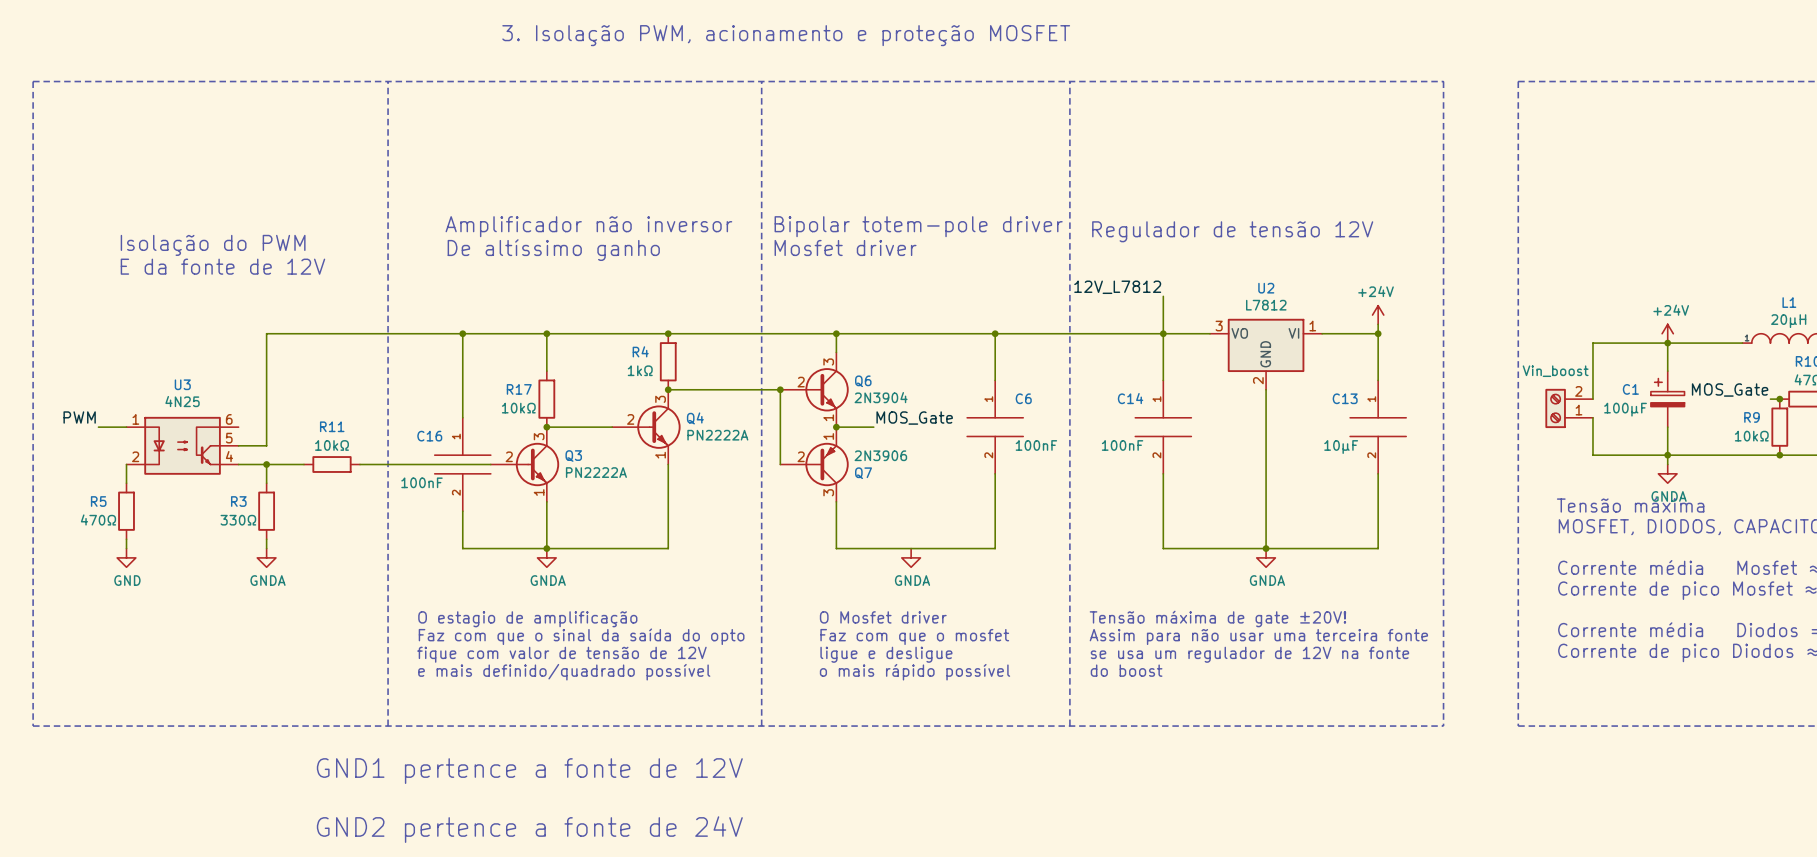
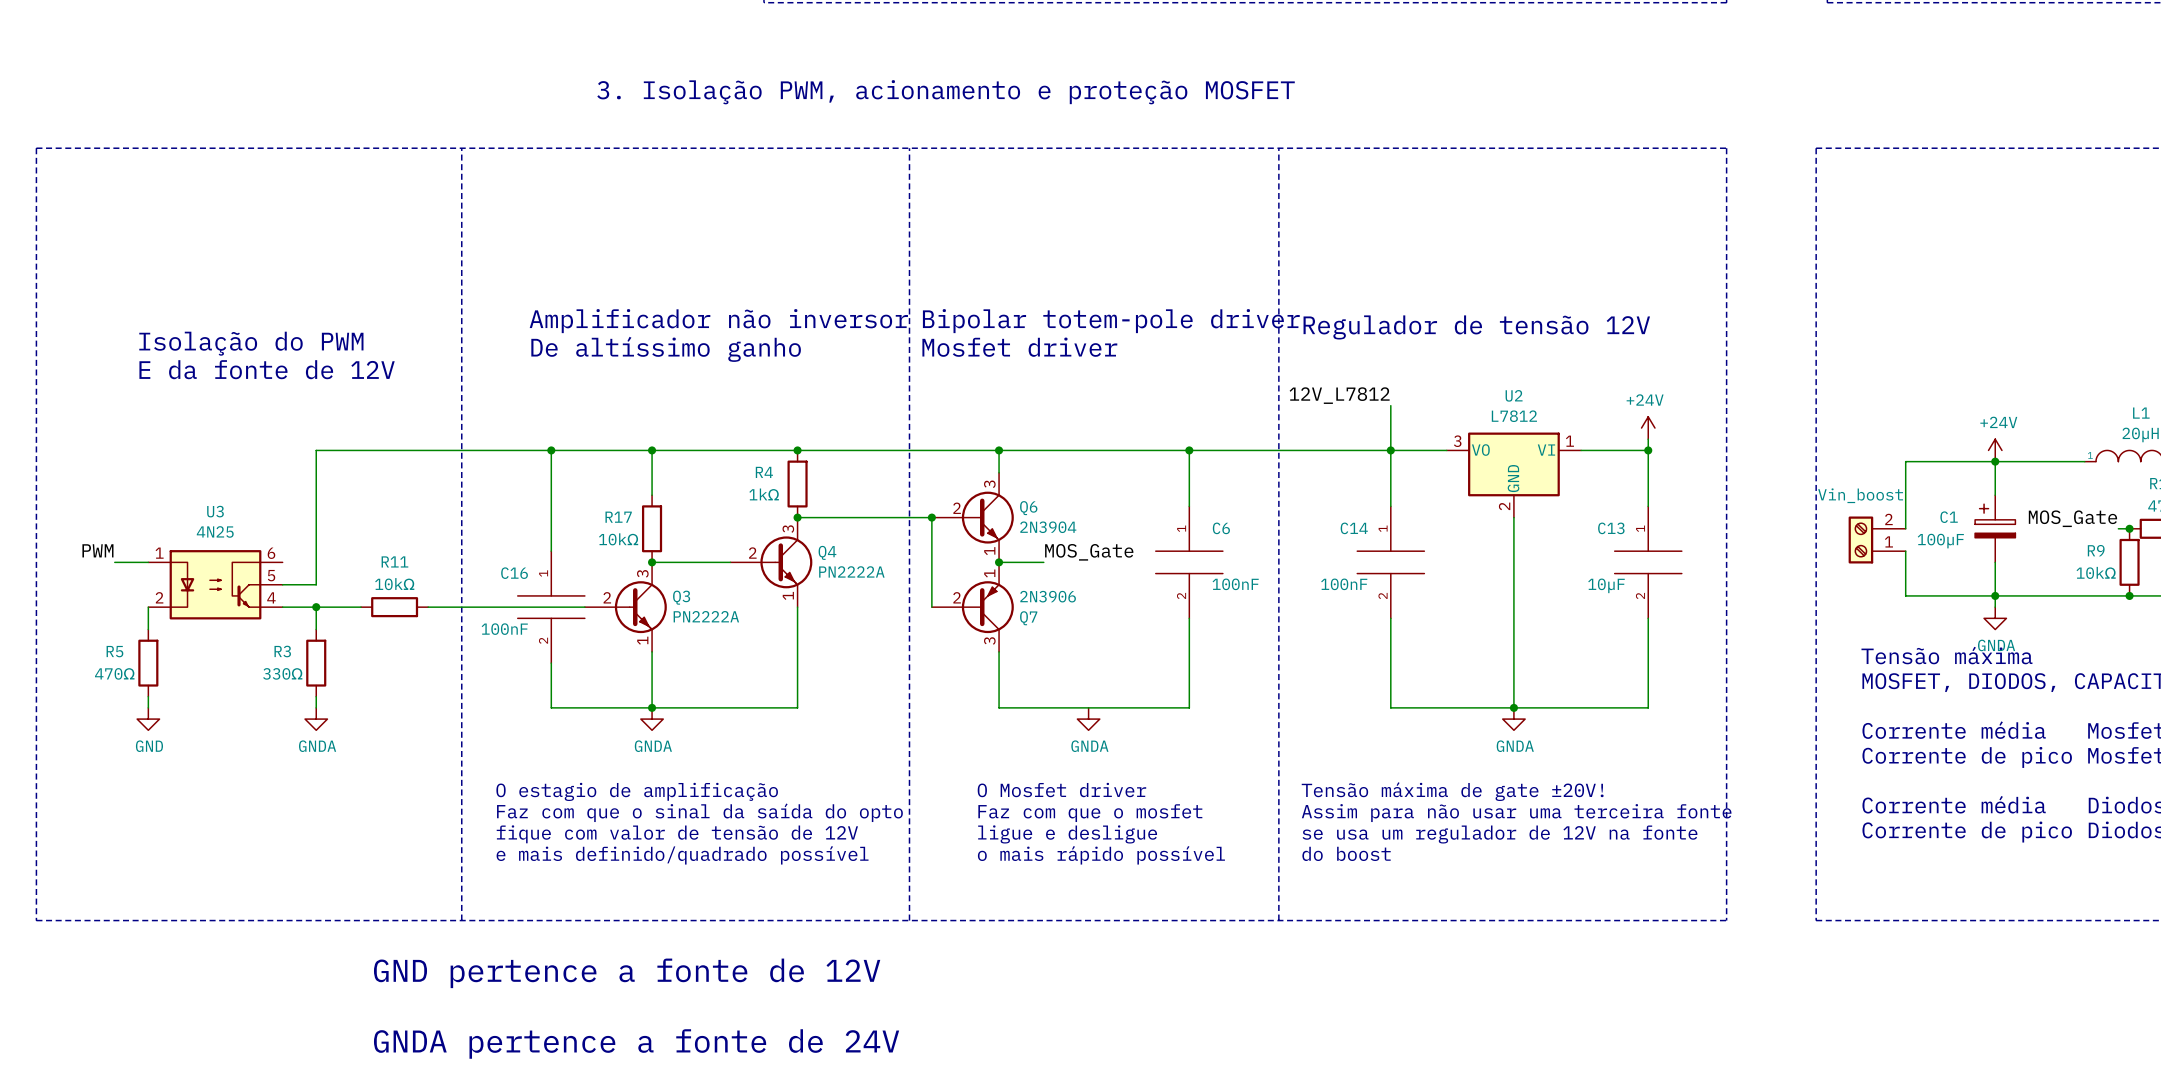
text: GND1 pertence a fonte de 12V (529, 771) -> GND pertence a fonte de 12V (627, 973)
text: GND2 pertence a fonte de 24V (529, 829) -> GNDA pertence a fonte de 24V (636, 1043)

